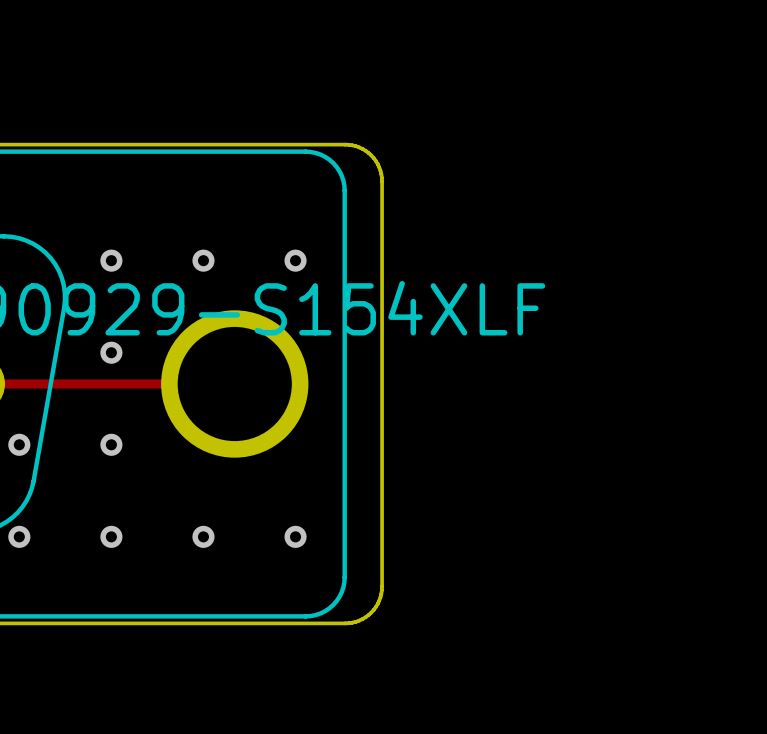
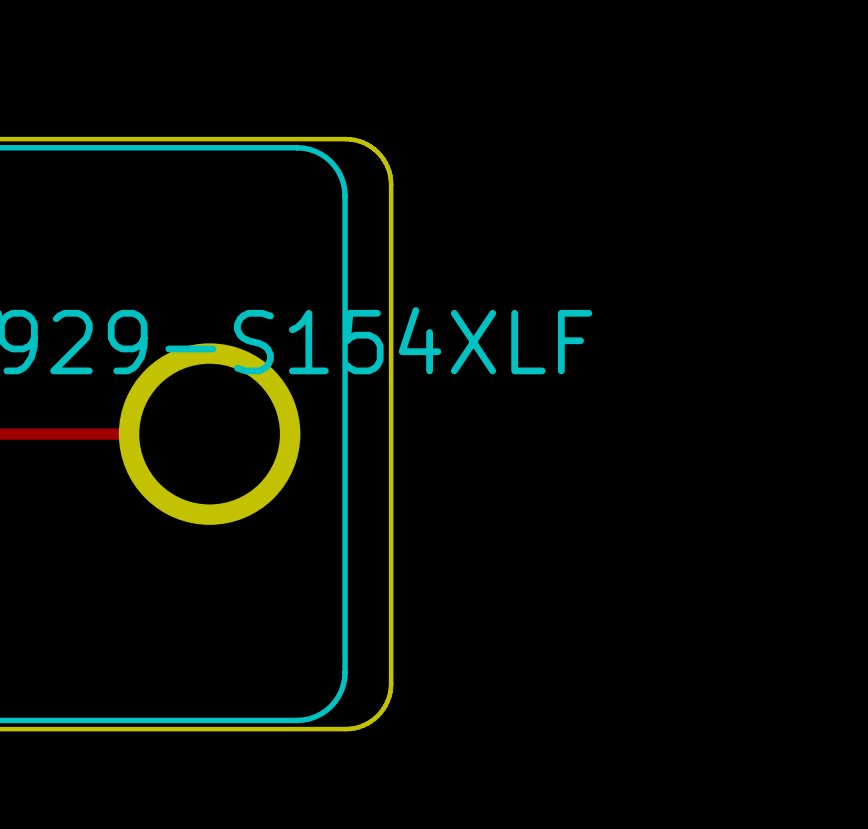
via: (111, 260) -> none
via: (203, 260) -> none
via: (295, 260) -> none
via: (111, 352) -> none
via: (111, 444) -> none
via: (111, 536) -> none
via: (203, 536) -> none
via: (295, 536) -> none

